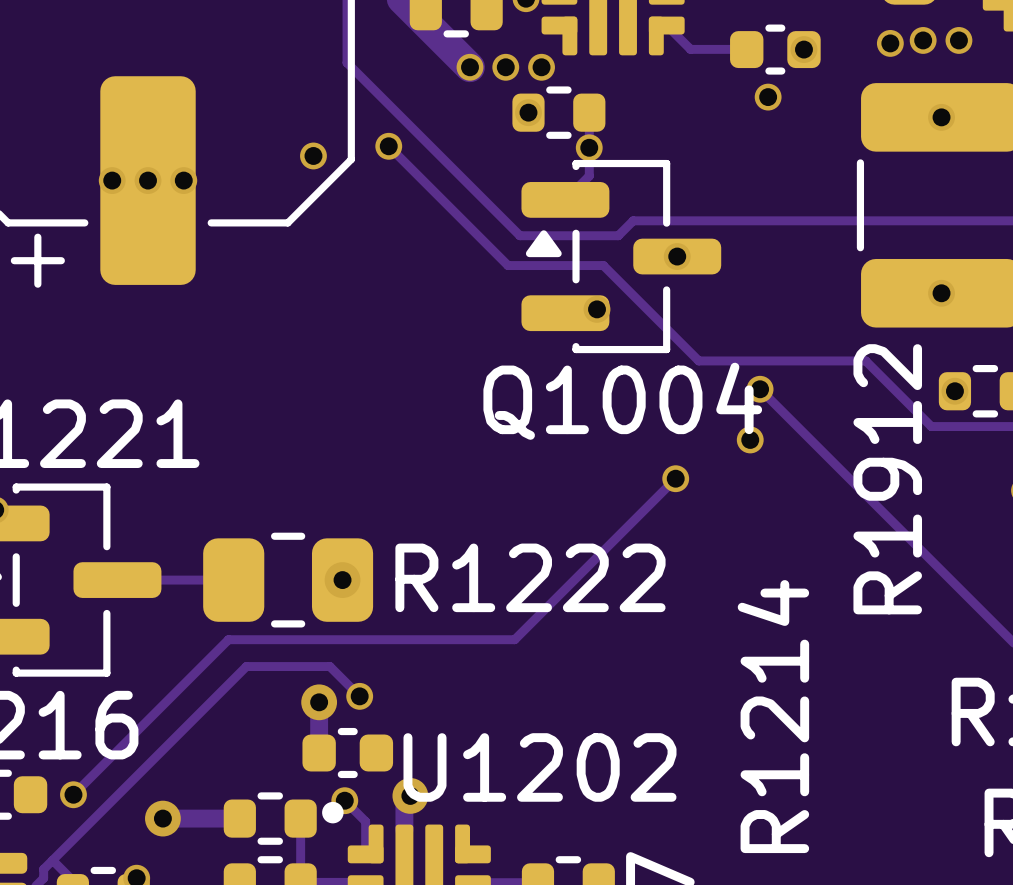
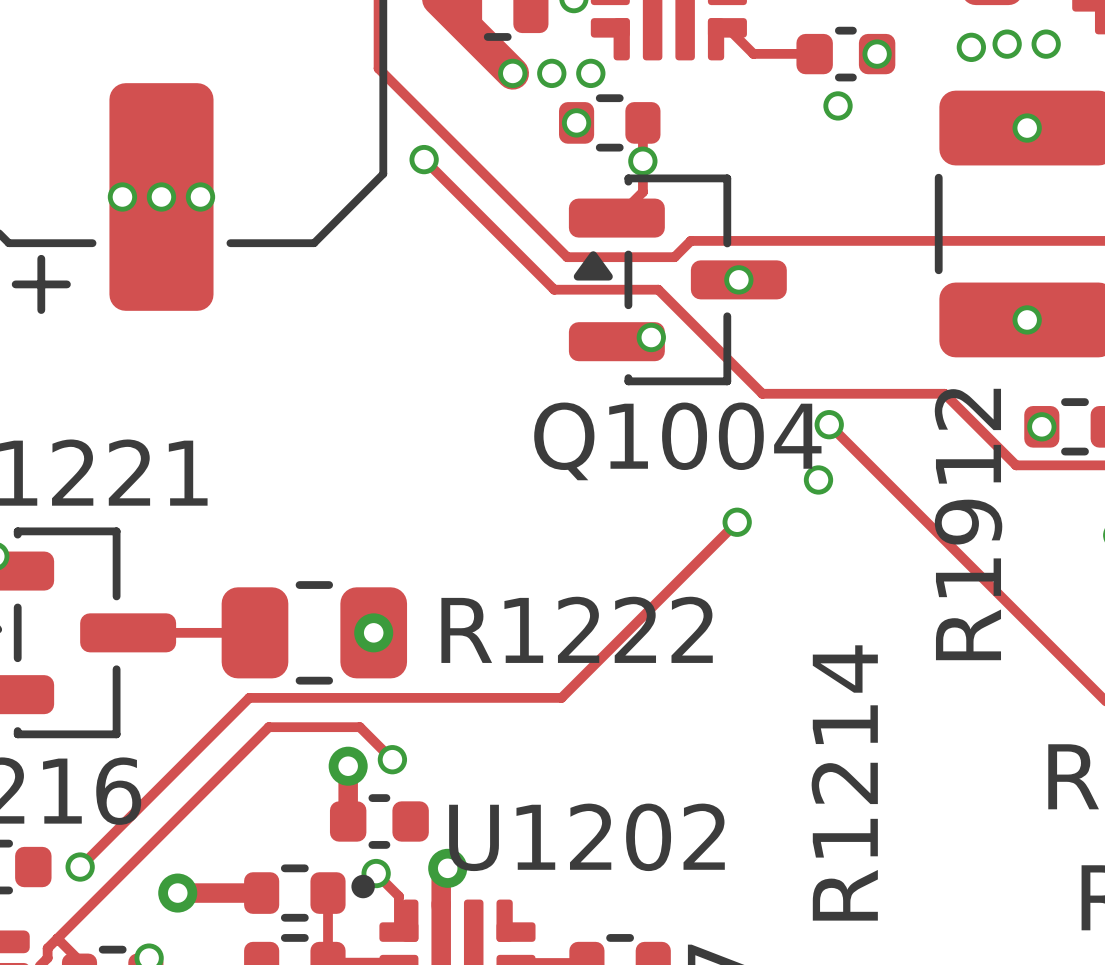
via: (313, 155) -> none

